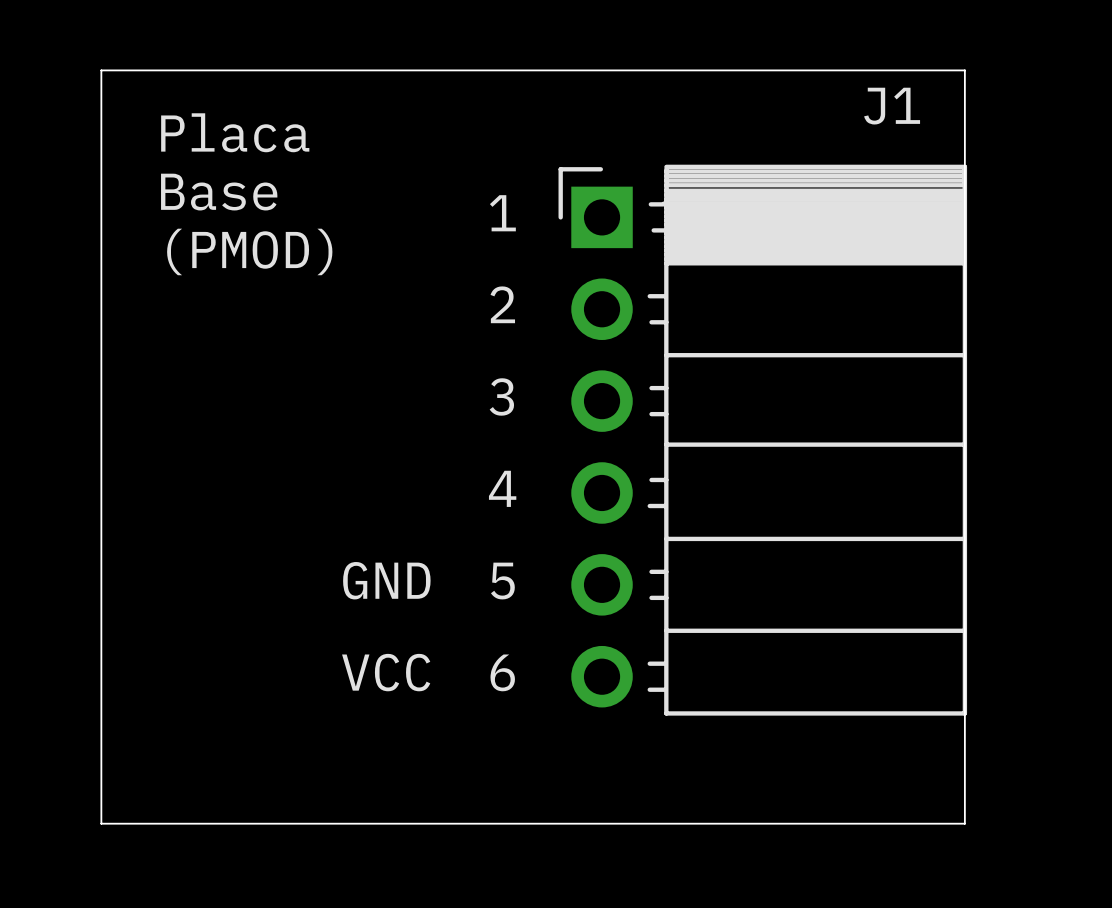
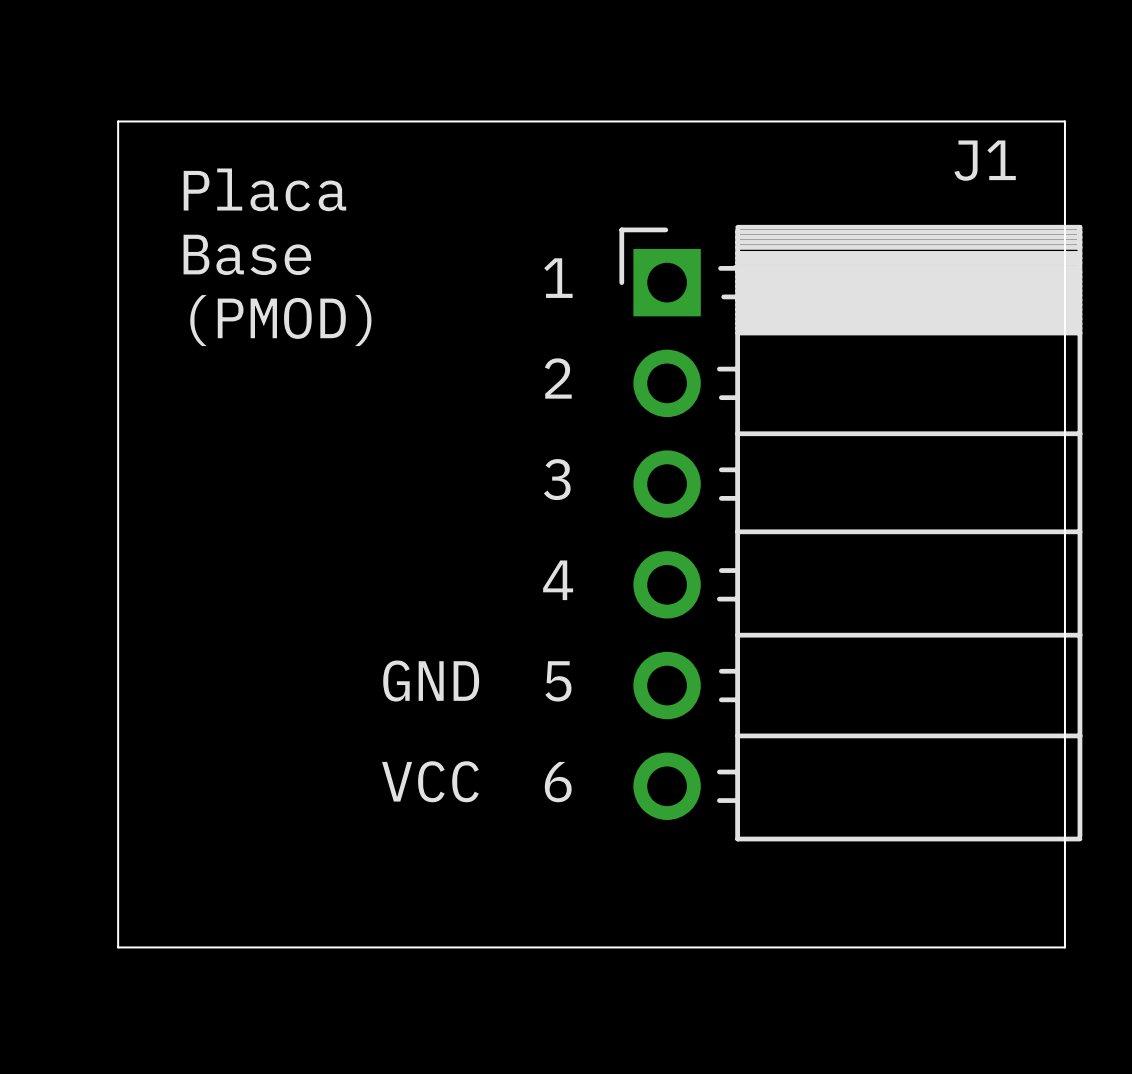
J1 footprint: [558, 164, 968, 716] -> [619, 224, 1083, 842]

